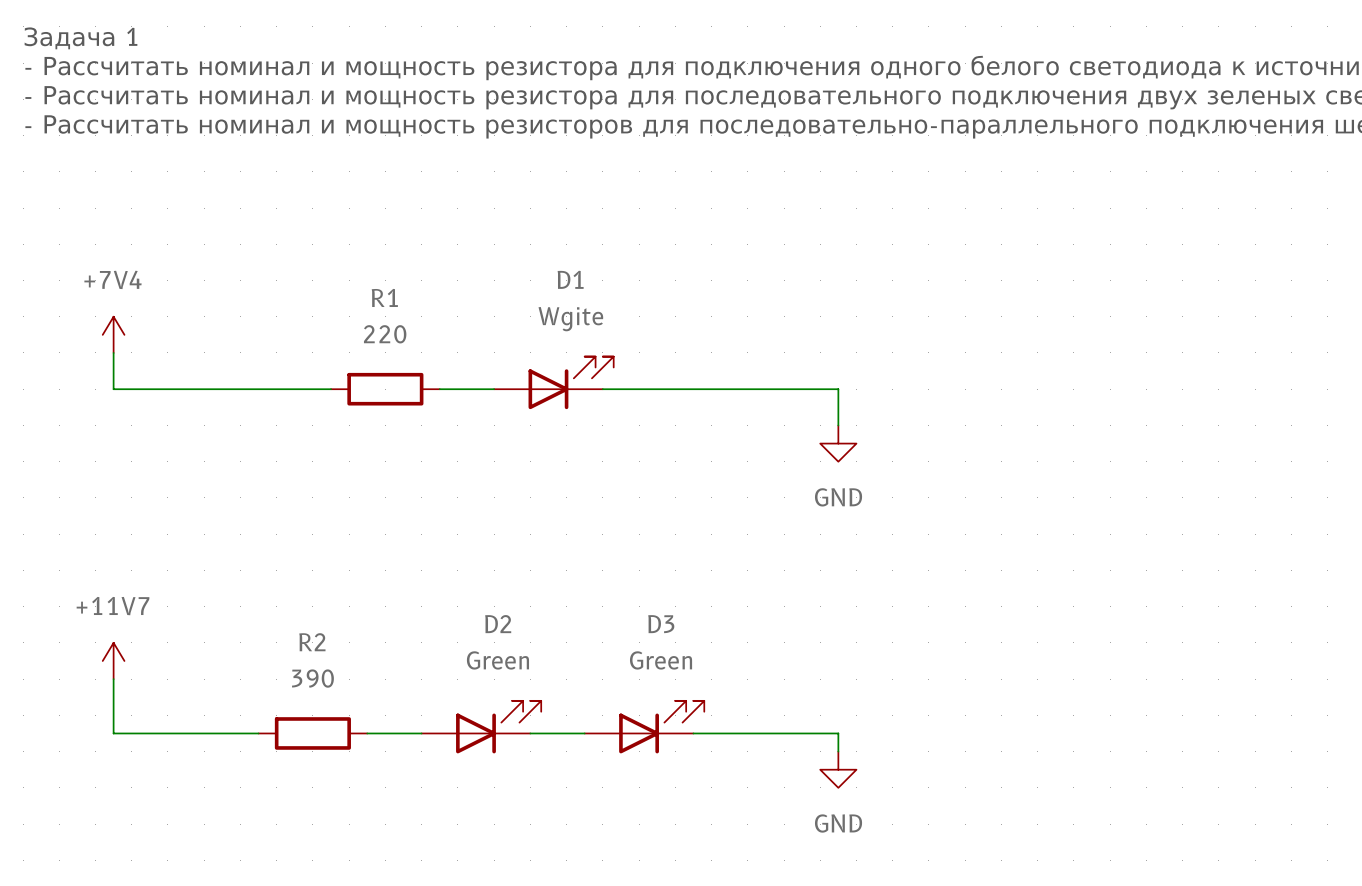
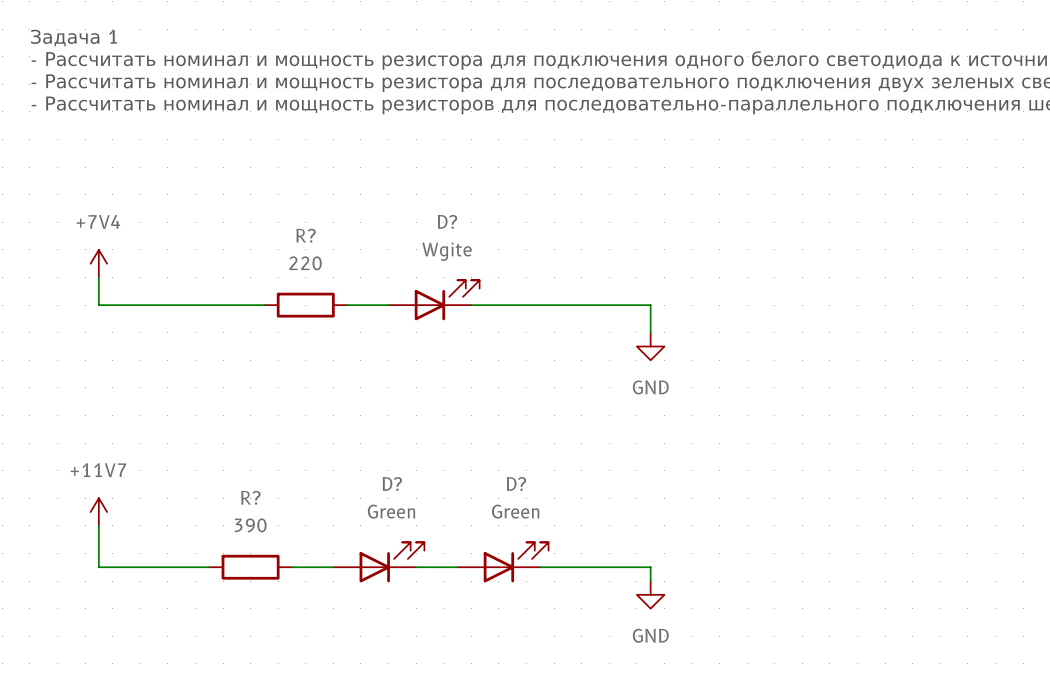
D1 name: D1 (570, 279) -> D? (447, 221)
R1 name: R1 (384, 297) -> R? (306, 235)
D2 name: D2 (498, 624) -> D? (392, 484)
D3 name: D3 (661, 624) -> D? (516, 484)
R2 name: R2 (312, 642) -> R? (250, 497)

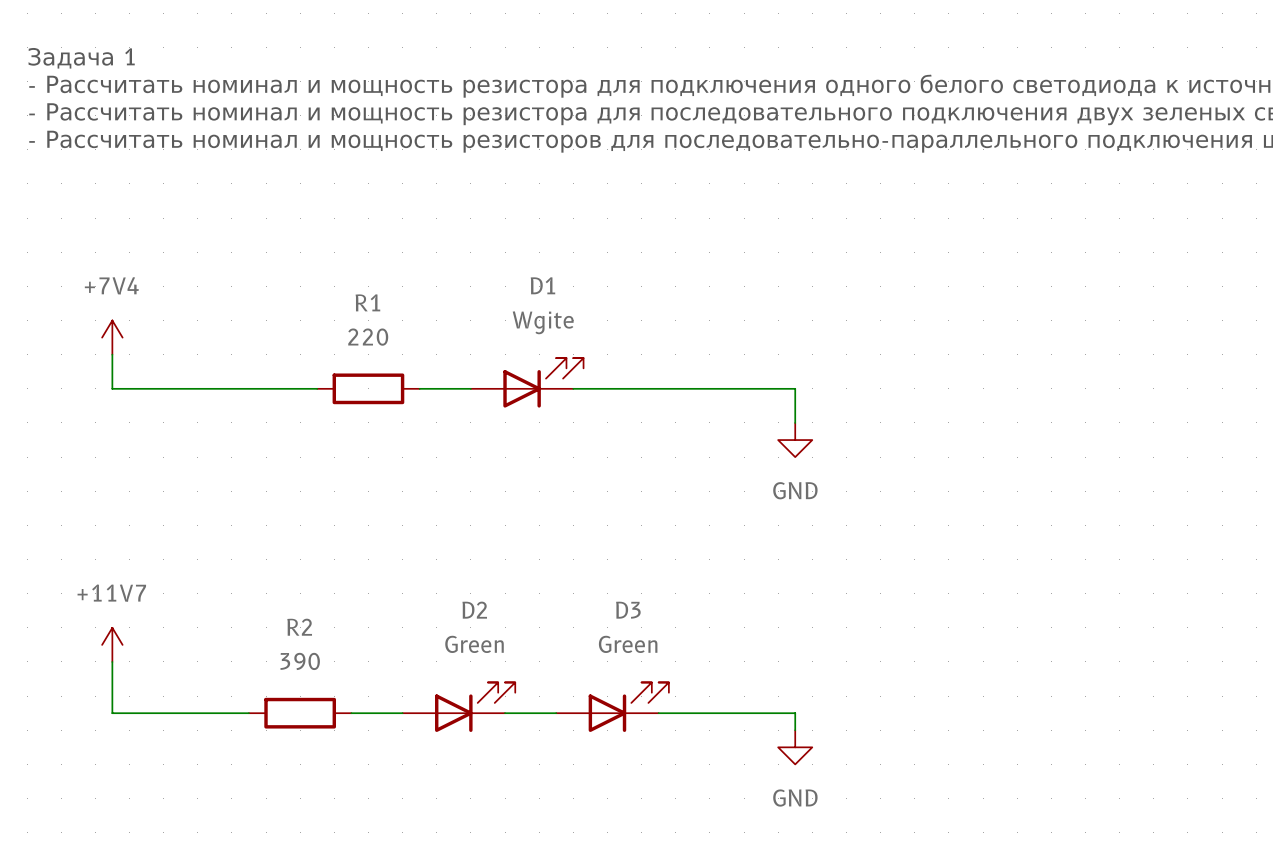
D? name: D? (447, 221) -> D1 (542, 285)
R? name: R? (306, 235) -> R1 (367, 302)
D? name: D? (392, 484) -> D2 (474, 610)
D? name: D? (516, 484) -> D3 (628, 610)
R? name: R? (250, 497) -> R2 (299, 627)

